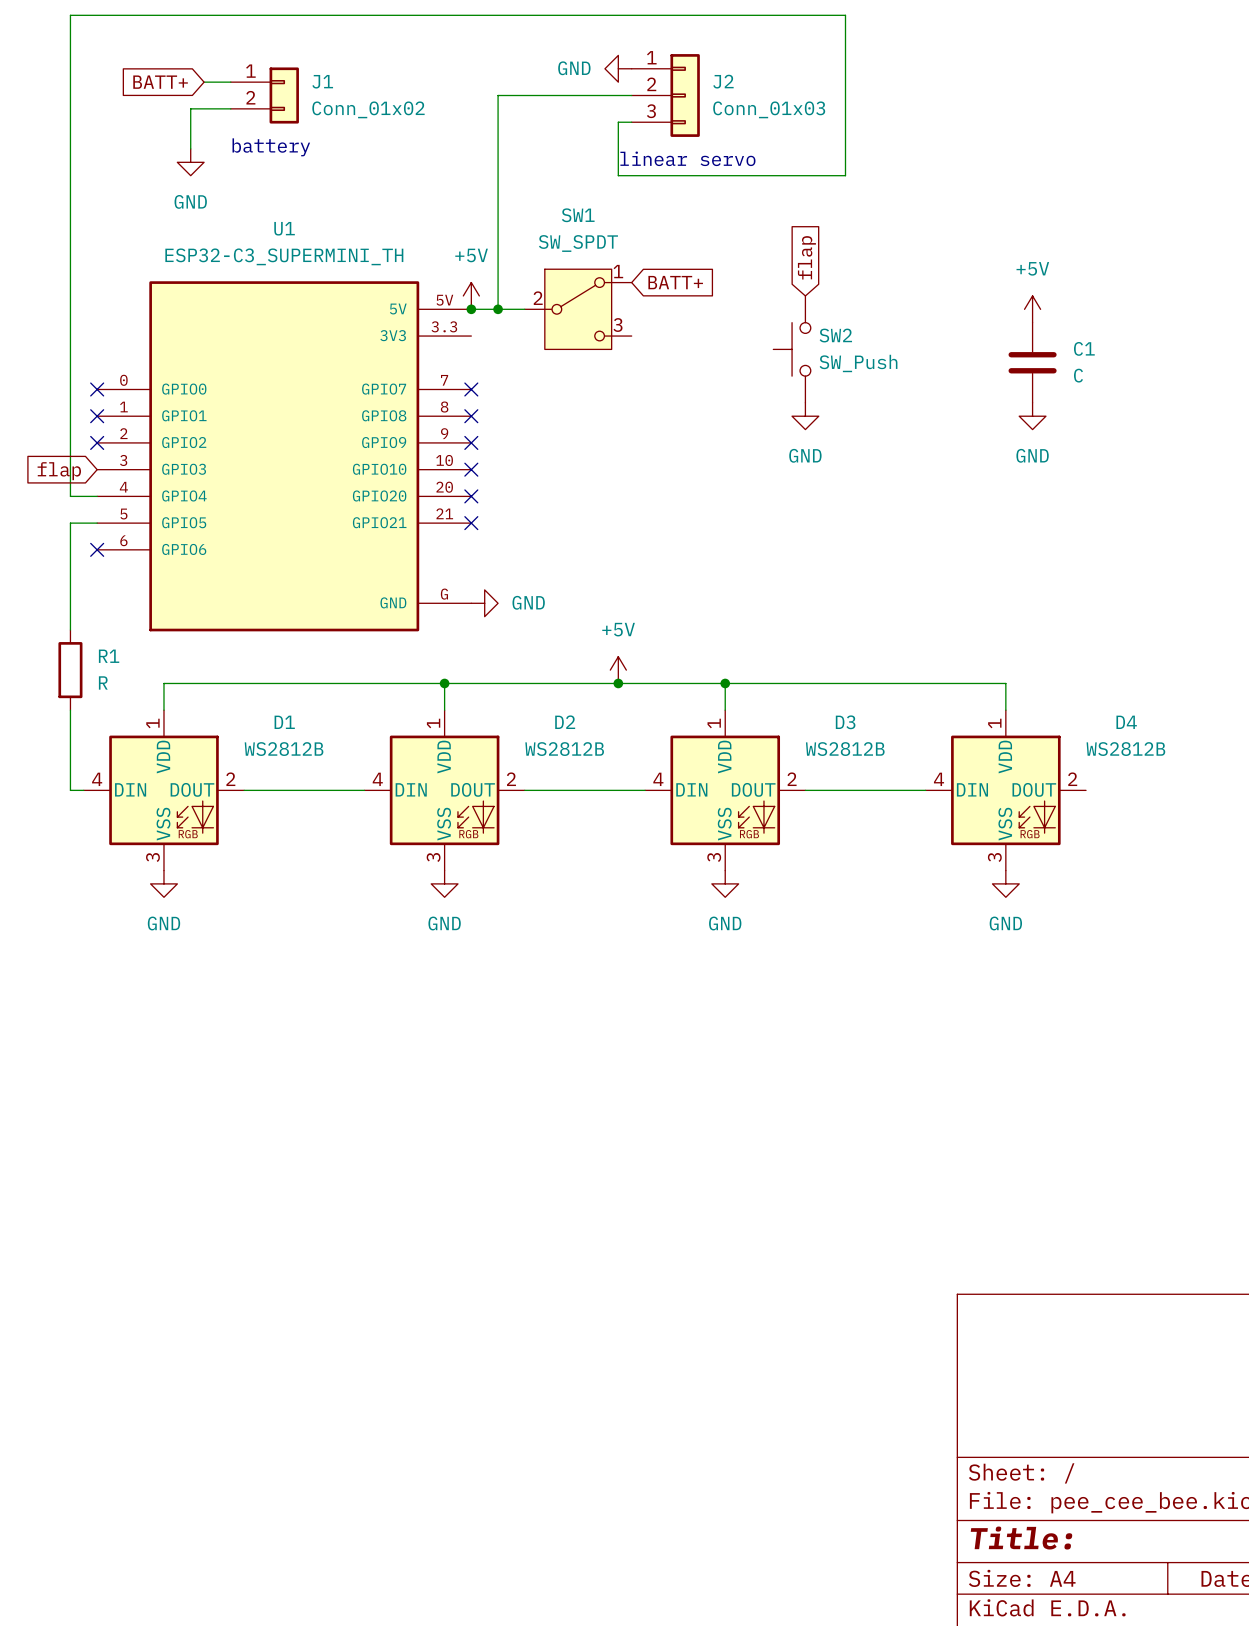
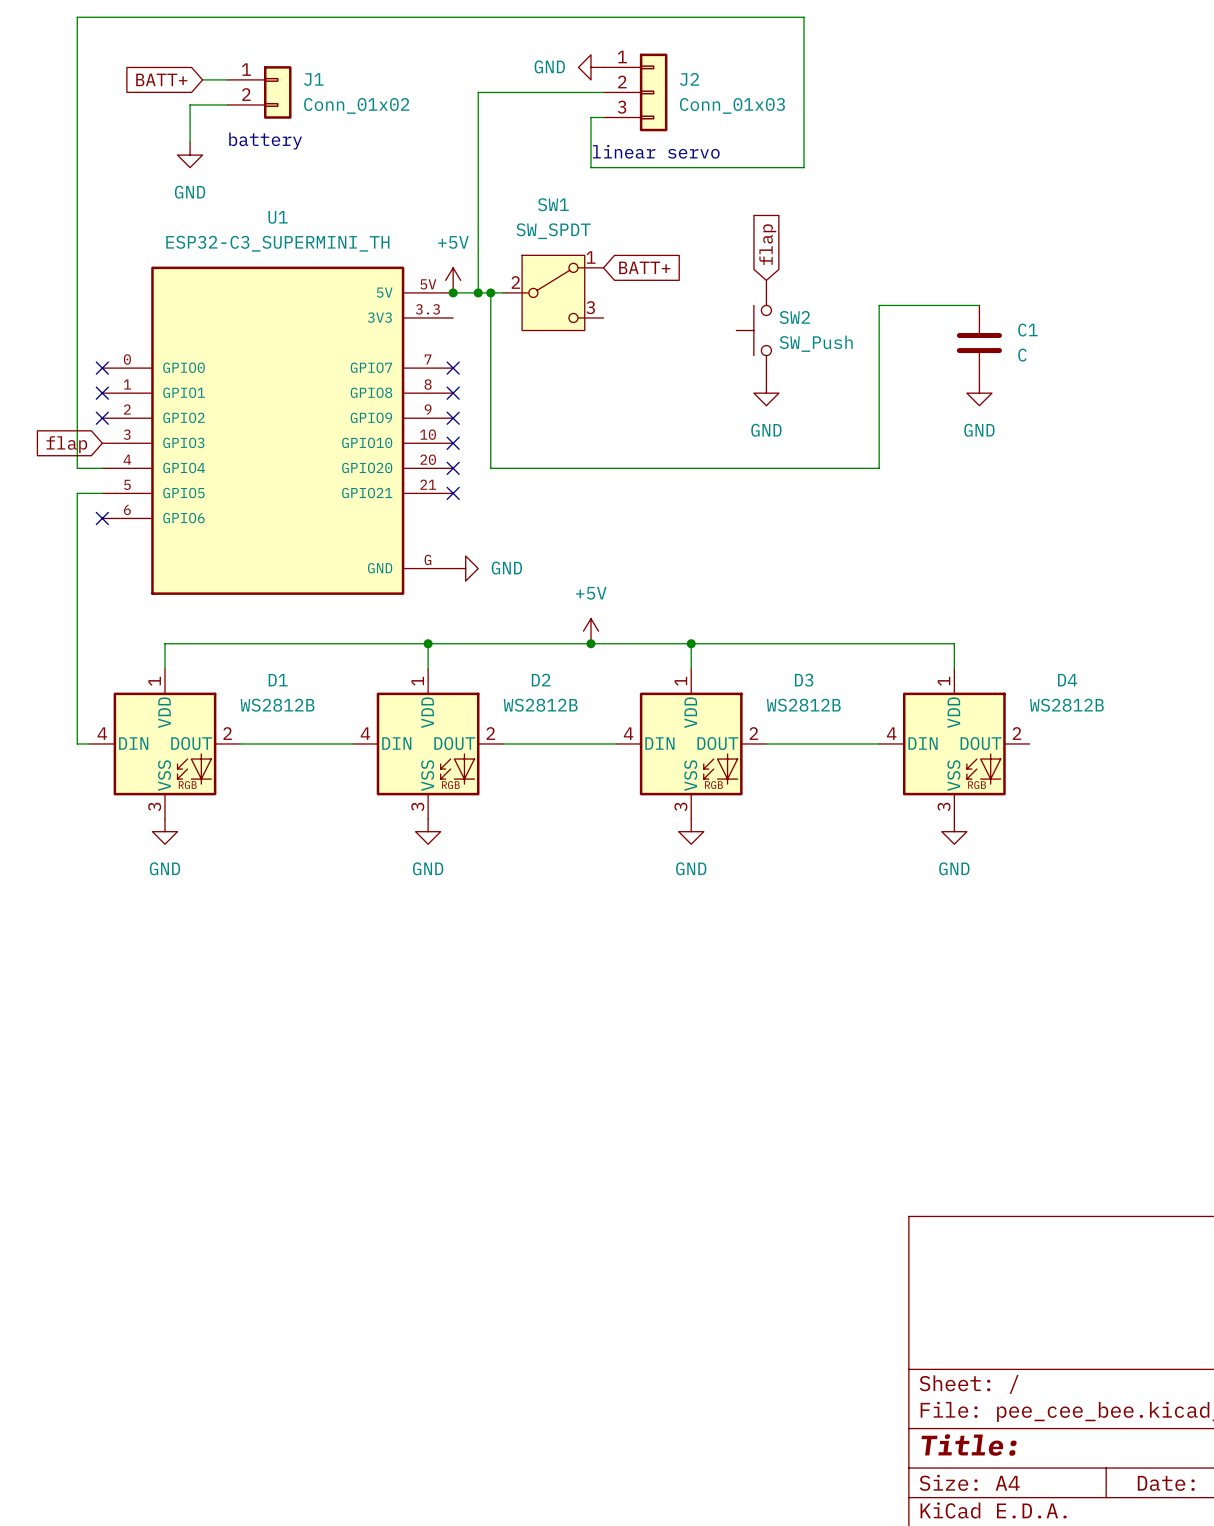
wire: none -> (490, 292) (490, 468) (879, 468) (879, 305) (979, 305)
junction: none -> (490, 292)
power symbol: +5V (1032, 309) -> none
wire: none -> (77, 593) (77, 668)
R1: R (70, 670) -> none

